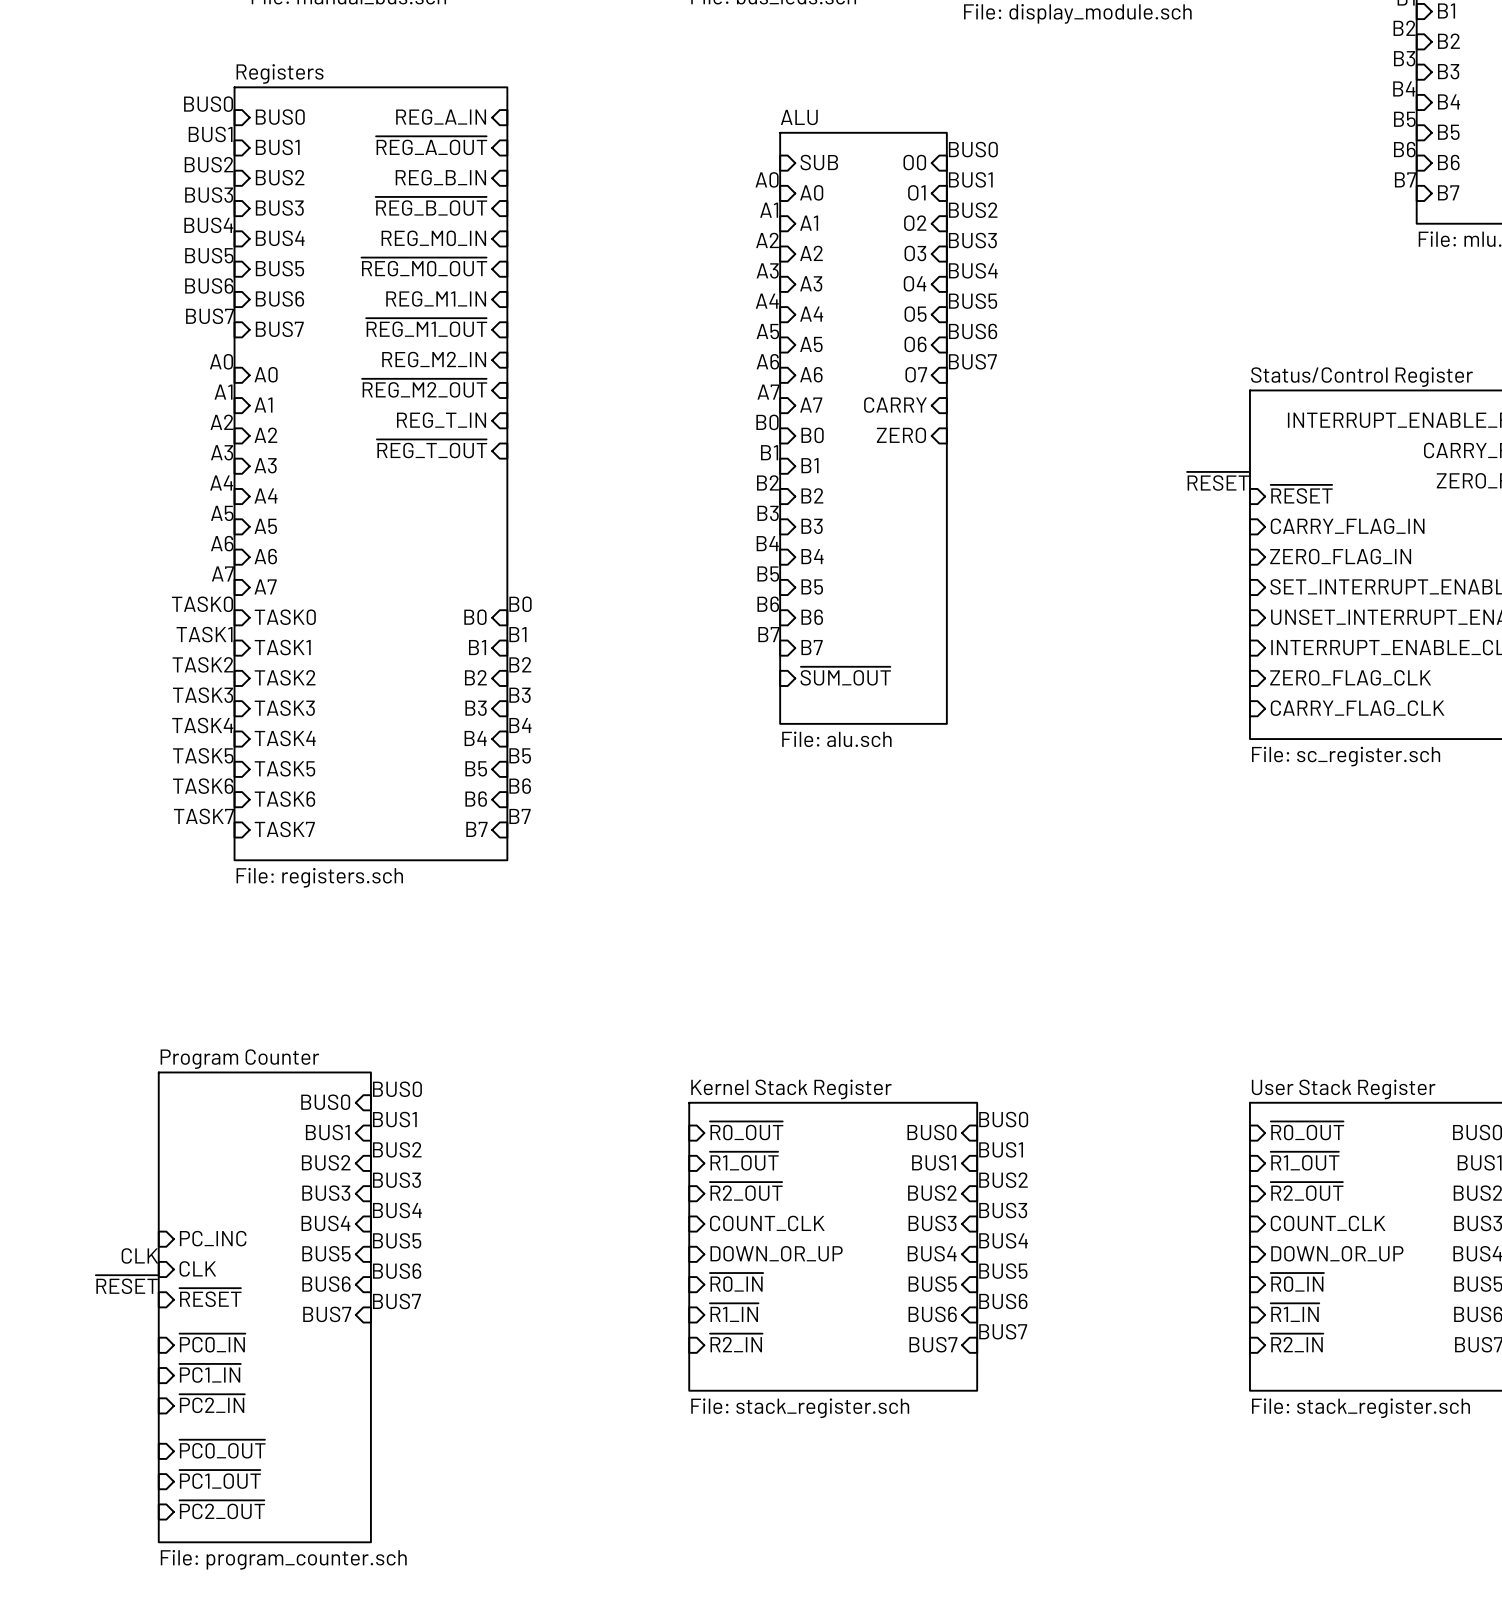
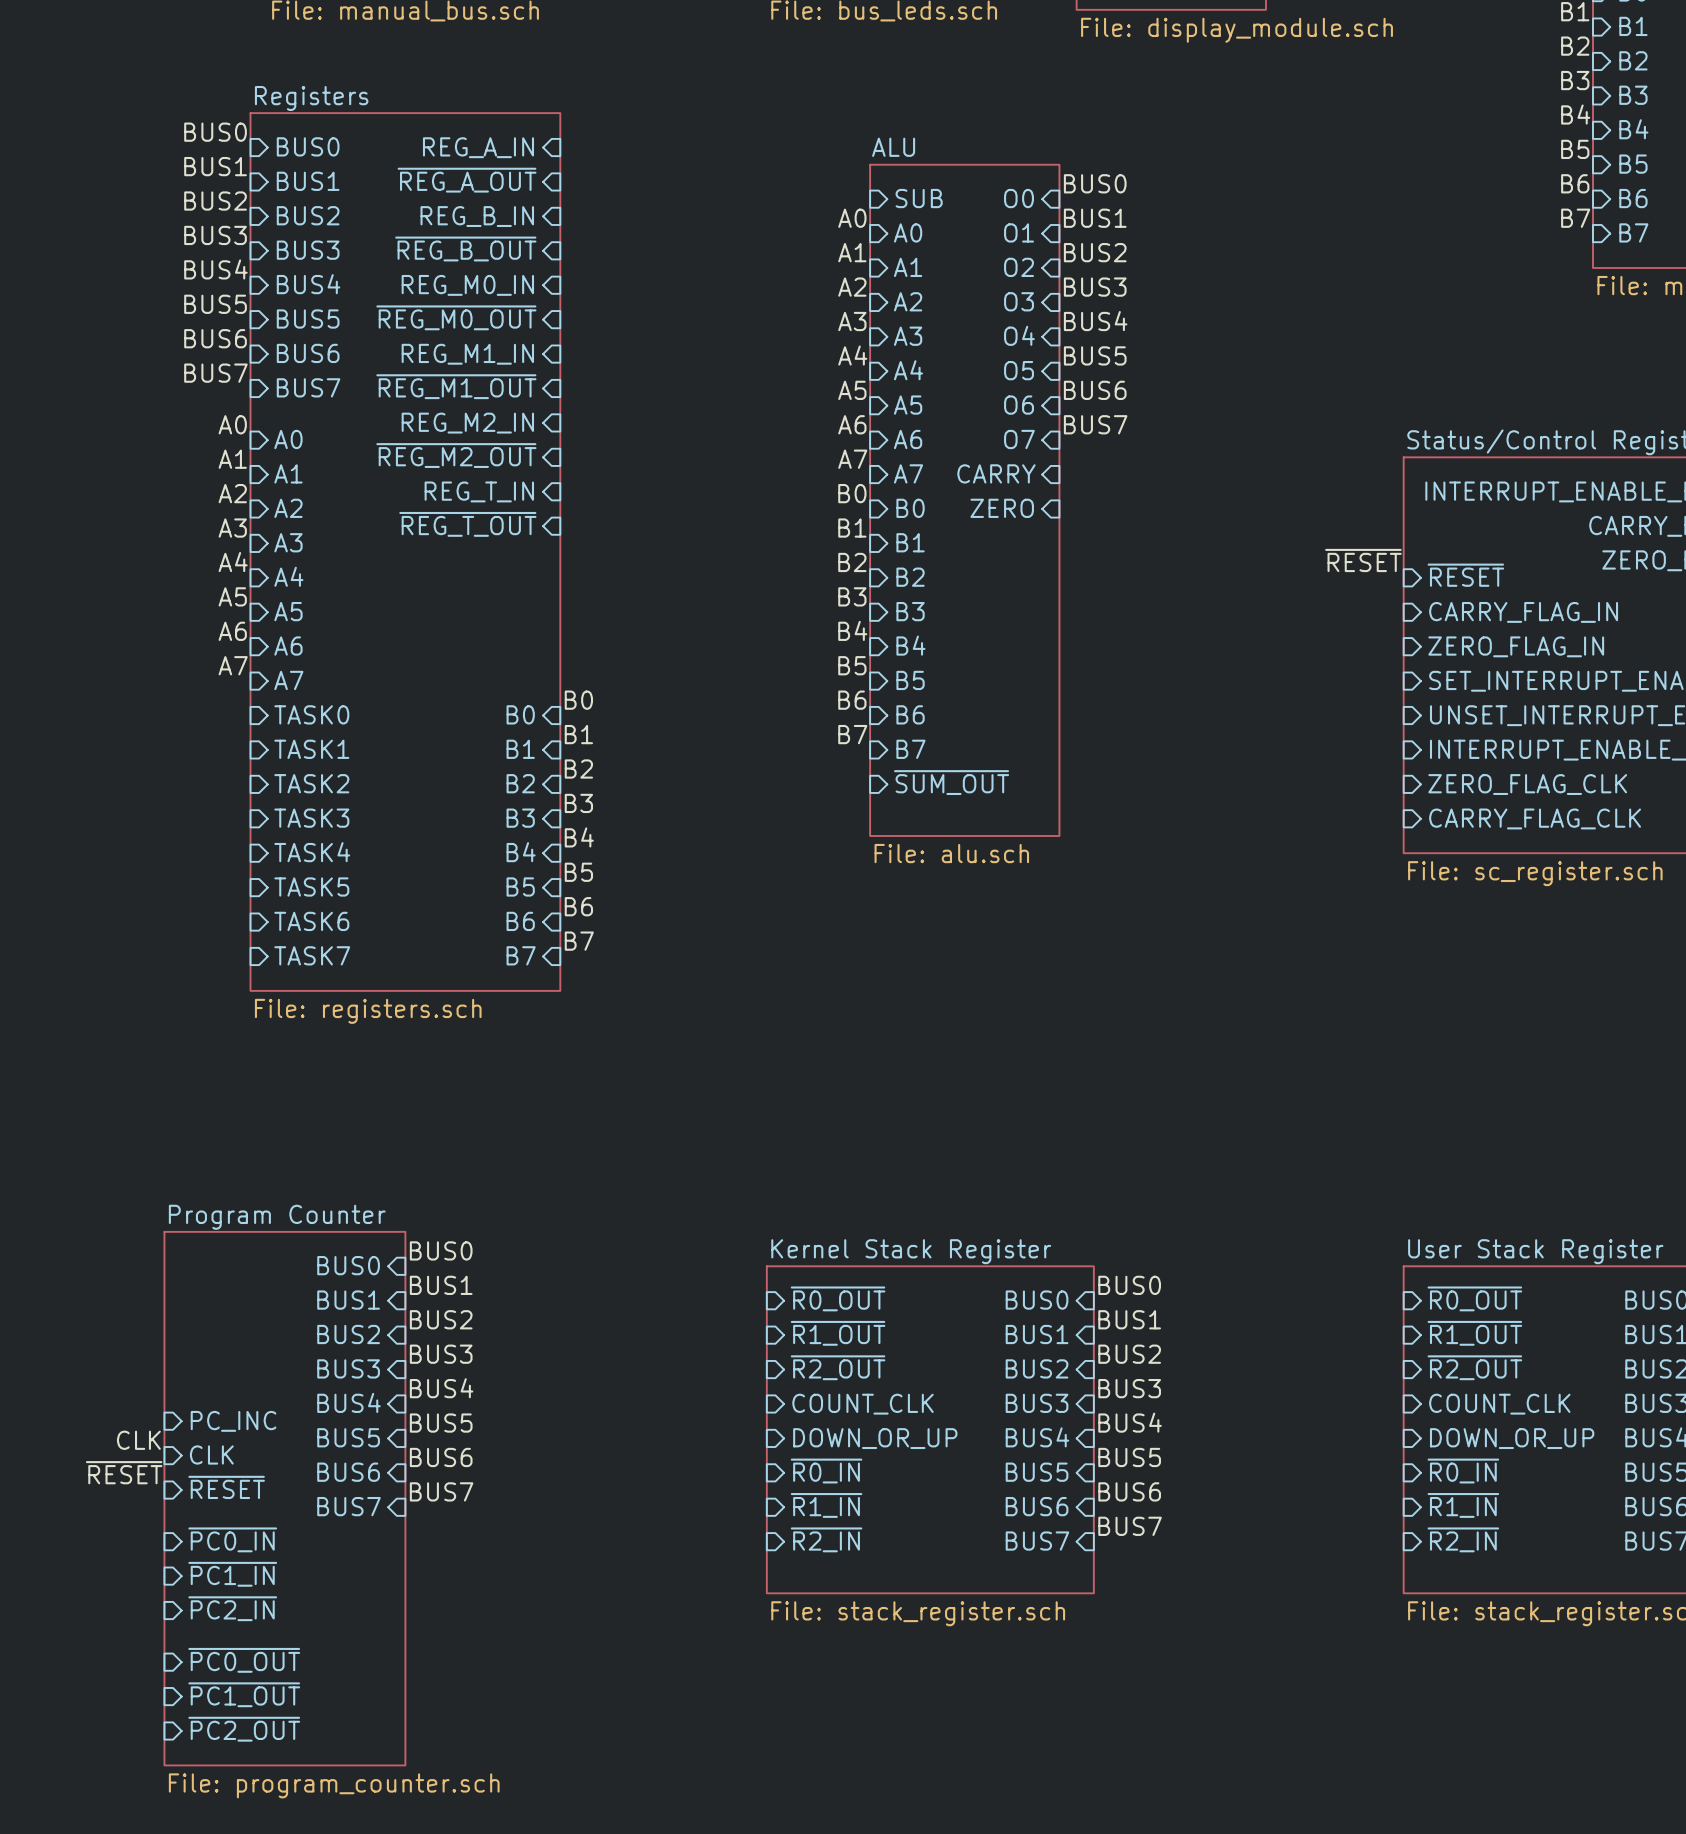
label: TASK0 (202, 604) -> none
label: TASK1 (204, 634) -> none
label: TASK2 (202, 664) -> none
label: TASK3 (203, 695) -> none
label: TASK4 (202, 725) -> none
label: TASK5 (203, 755) -> none
label: TASK6 (203, 786) -> none
label: TASK7 (203, 816) -> none

